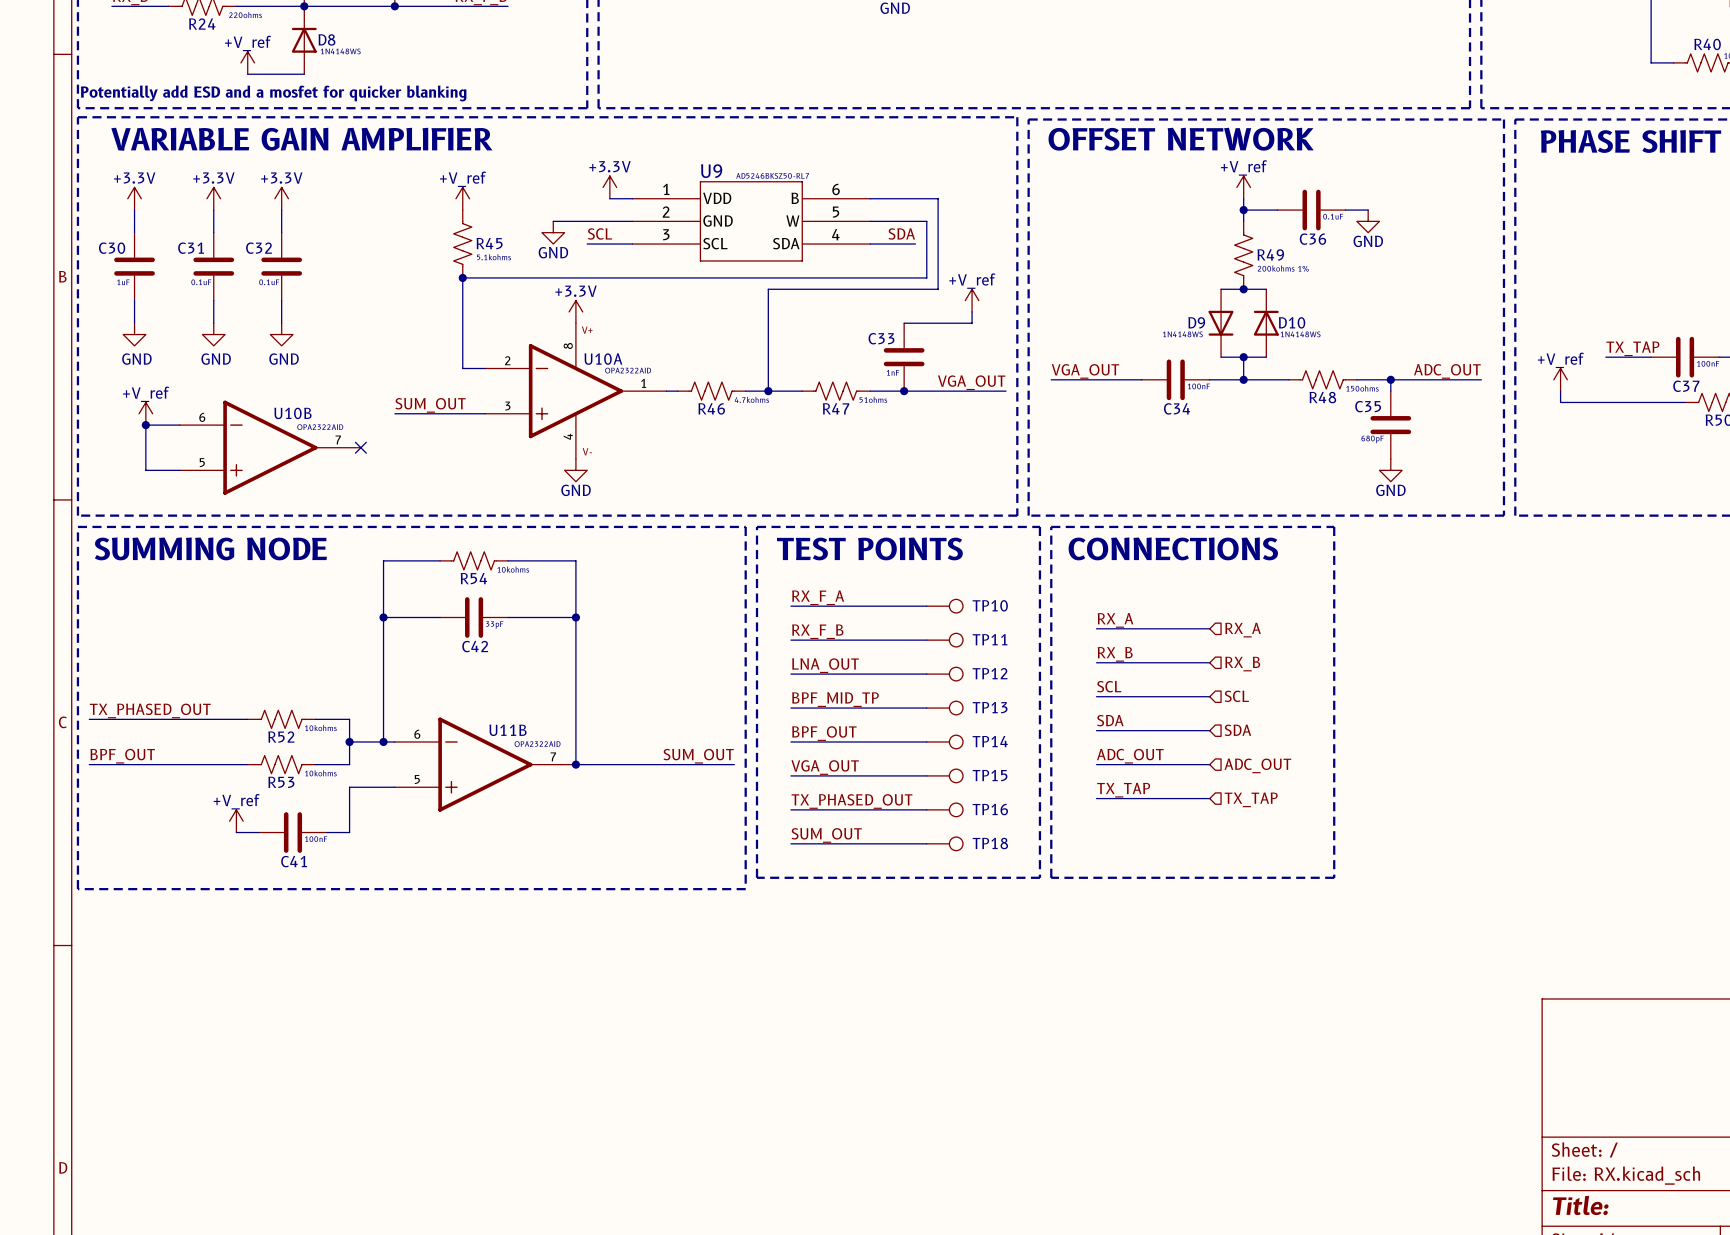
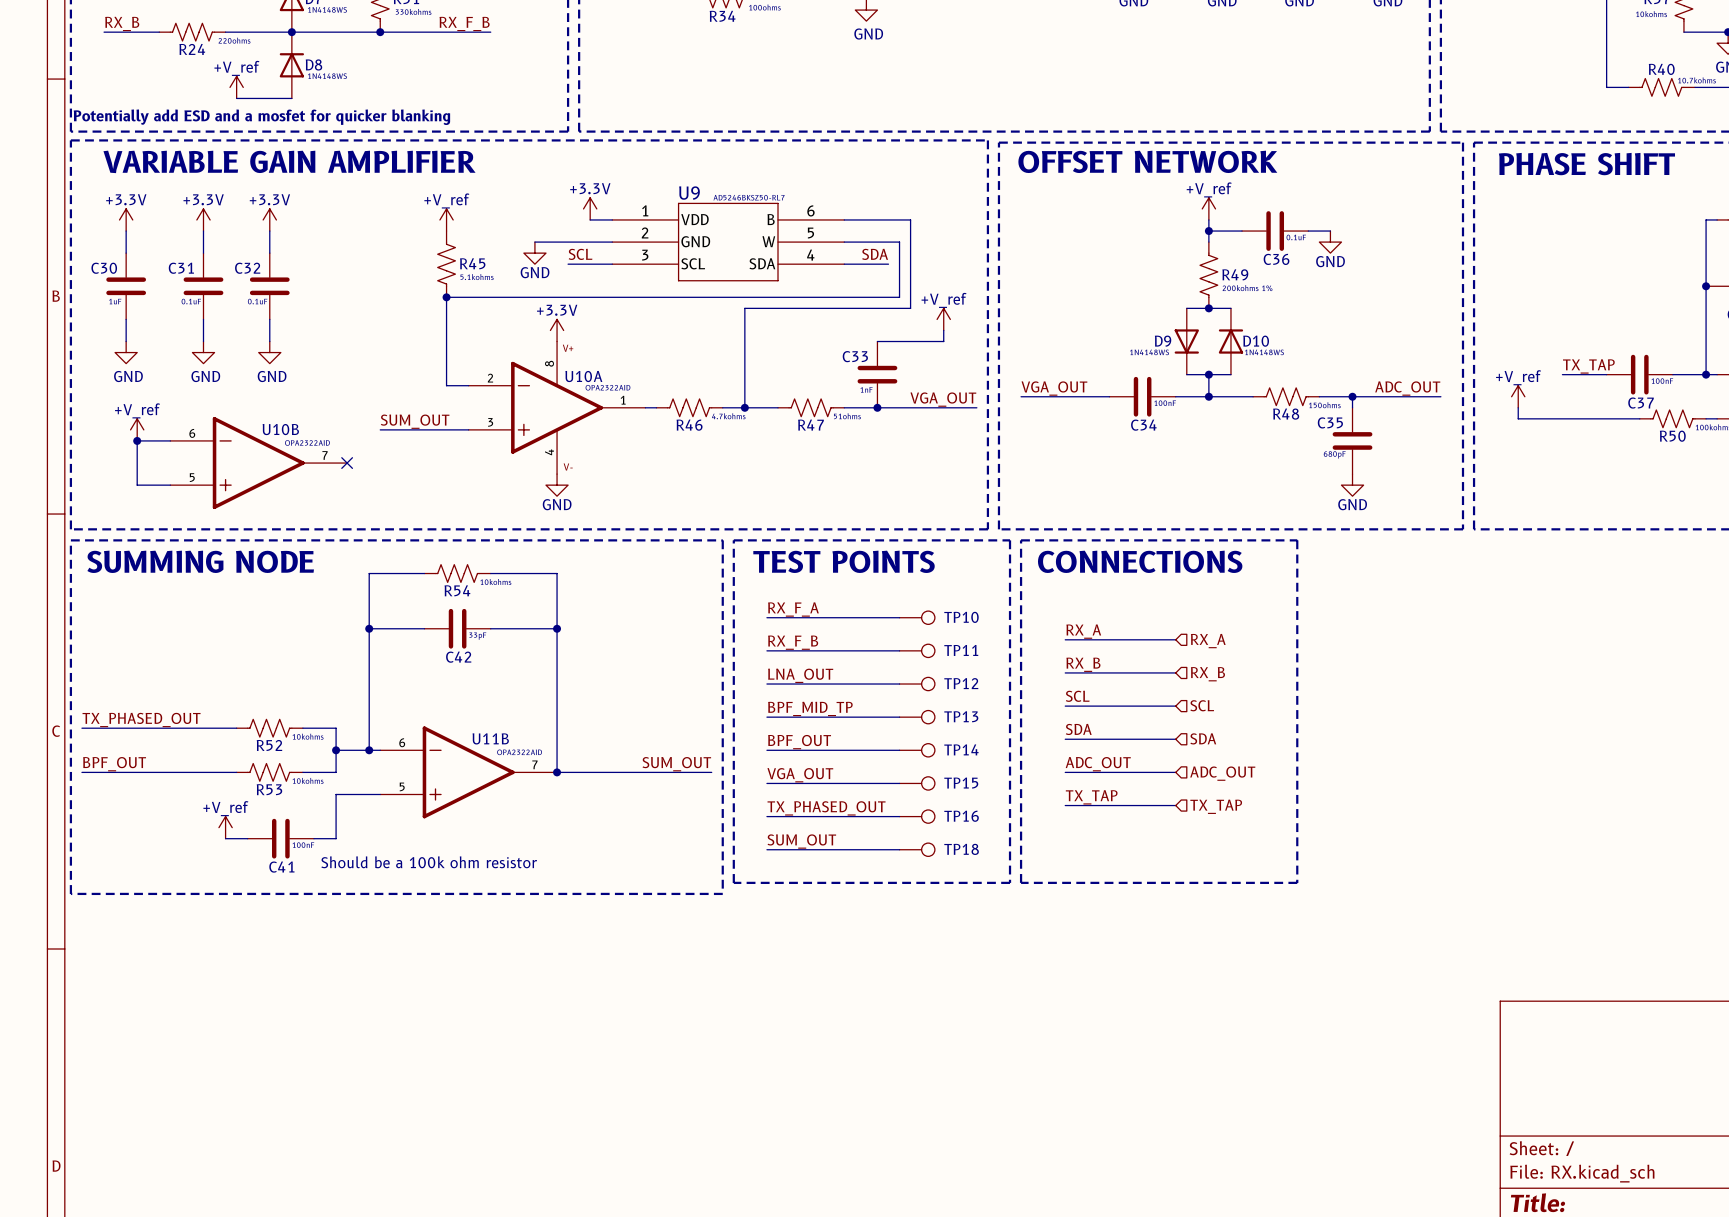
text: none -> Should be a 100k ohm resistor (429, 862)

